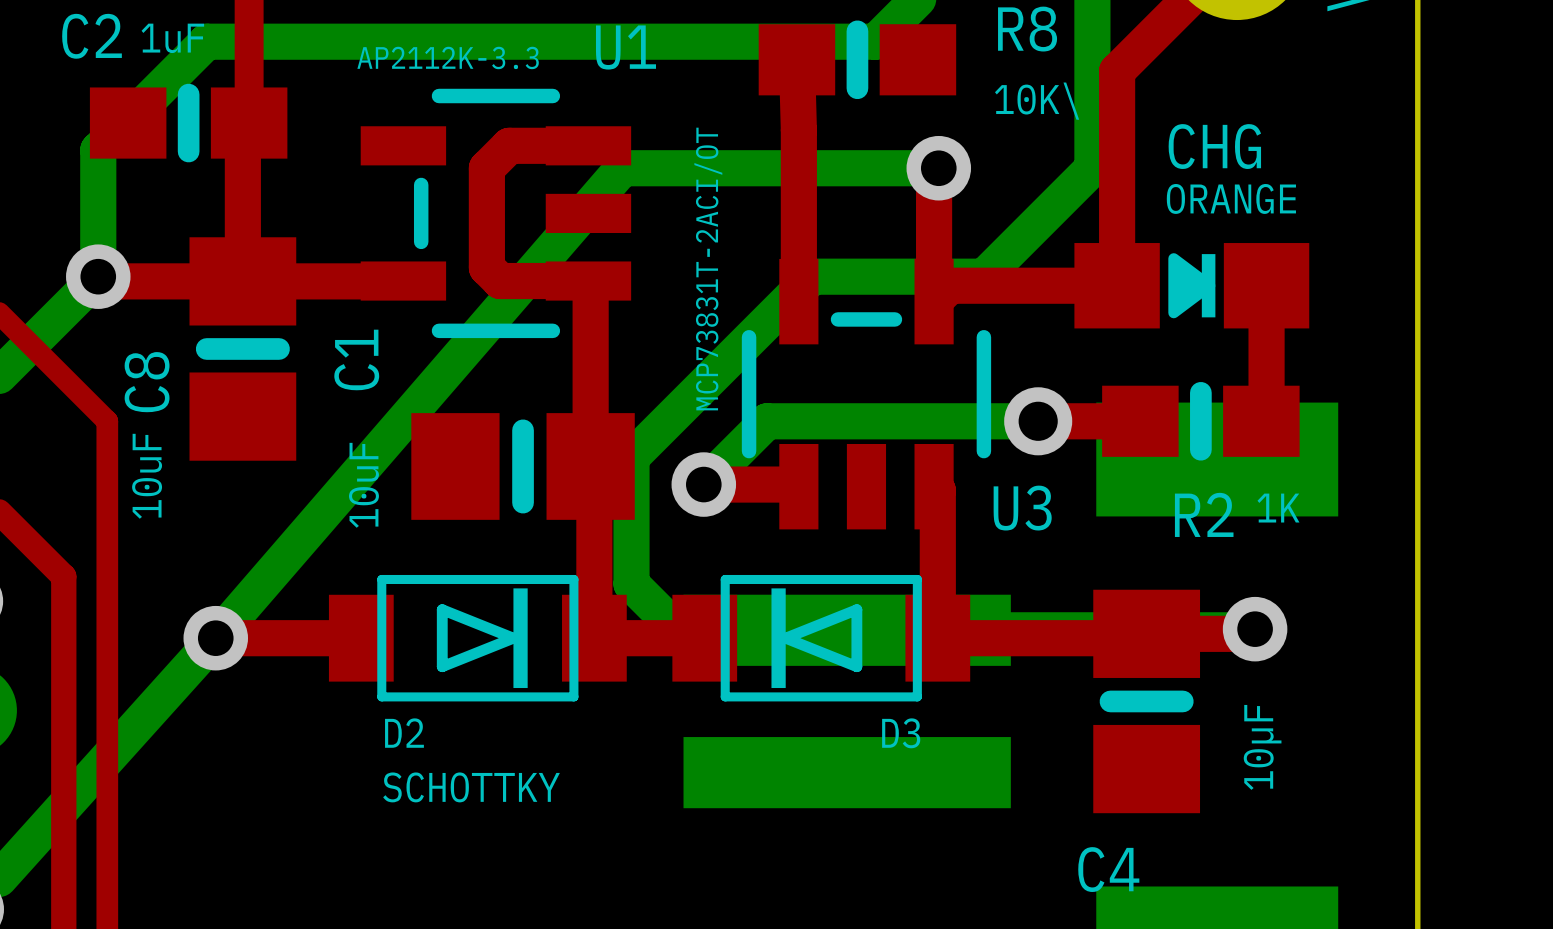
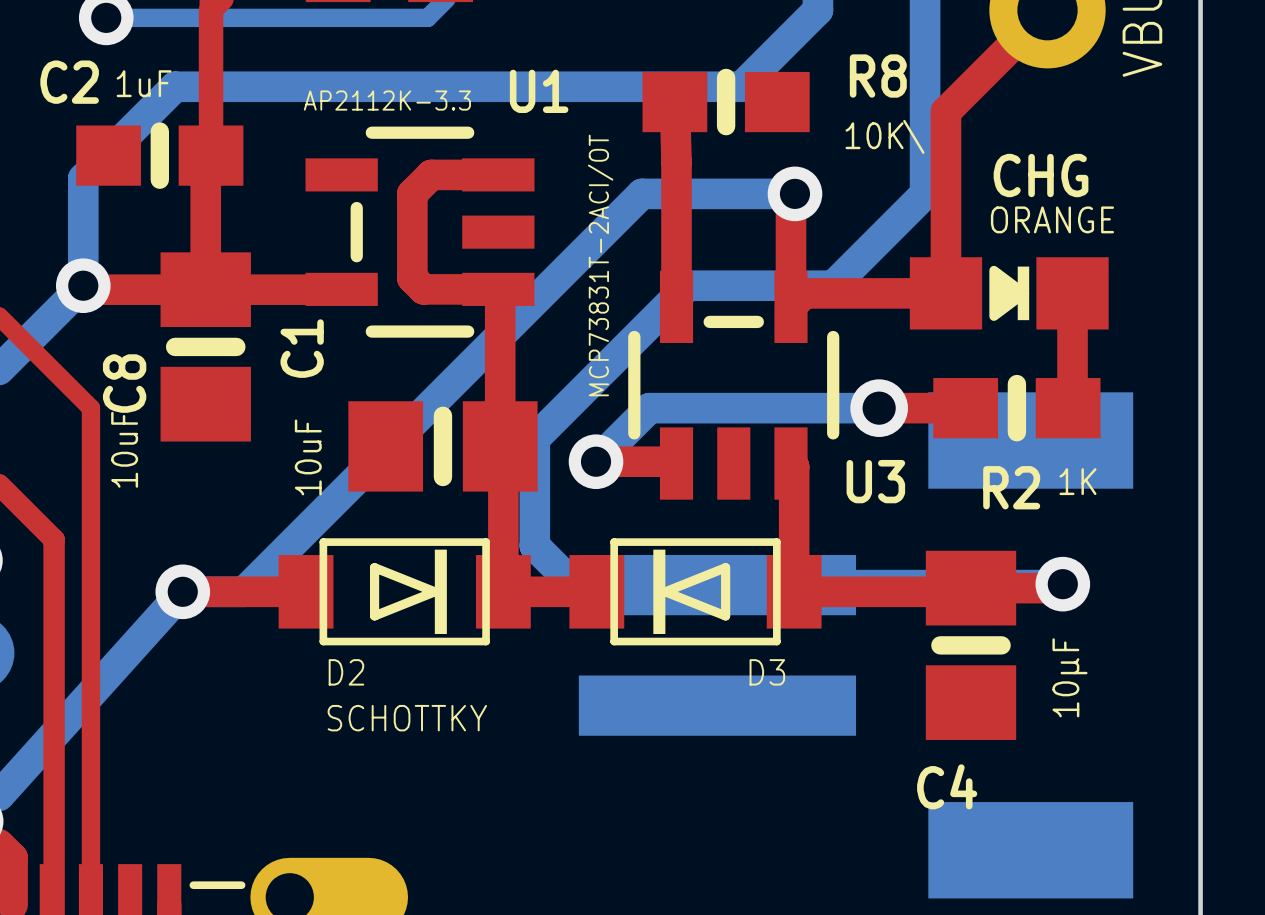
bottom track: (758, 168) (622, 168) (215, 638) -> (641, 193) (243, 591) (182, 591)

